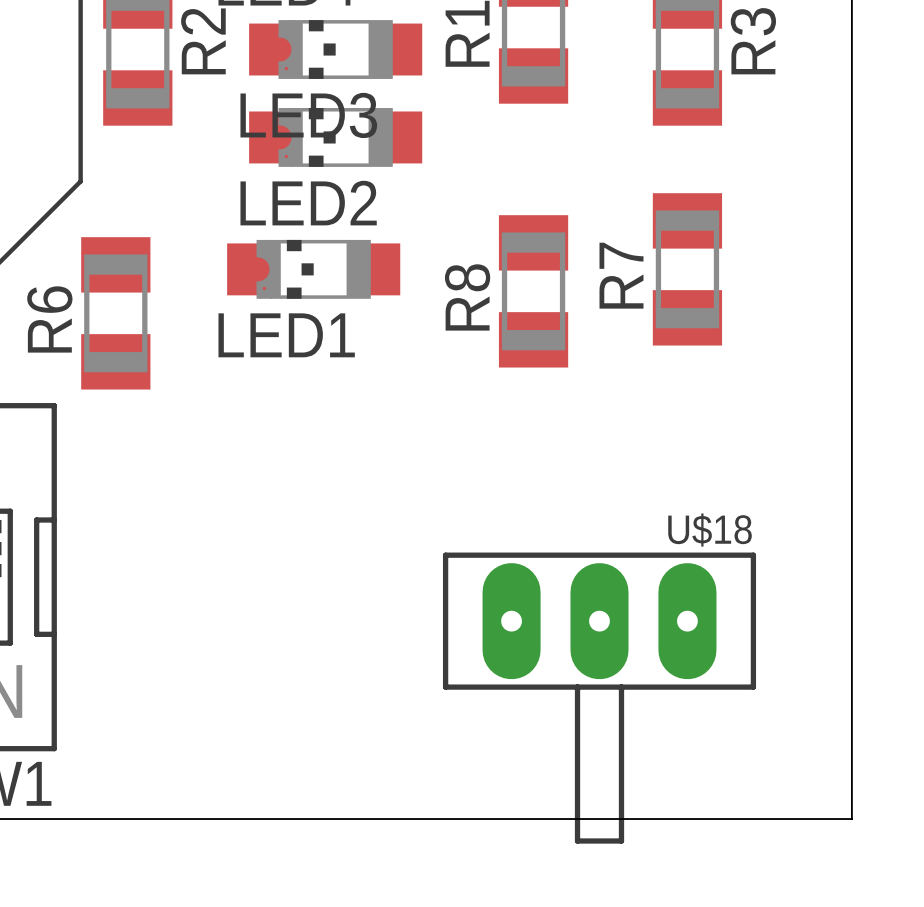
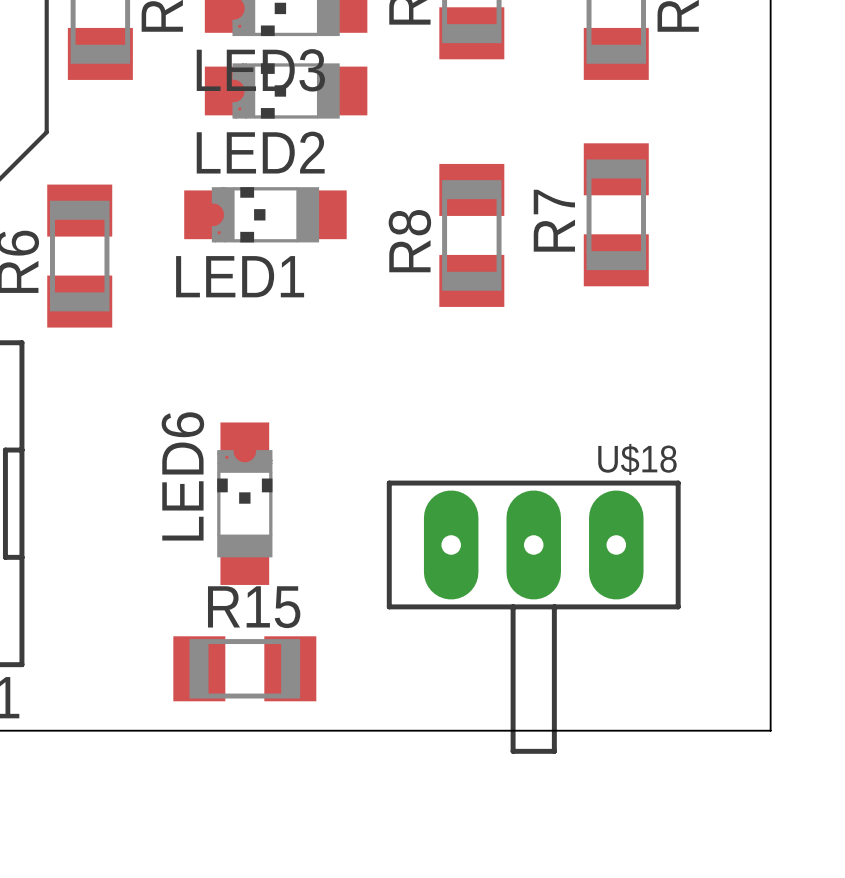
LED6: none -> (244, 503)
R15: none -> (244, 668)

